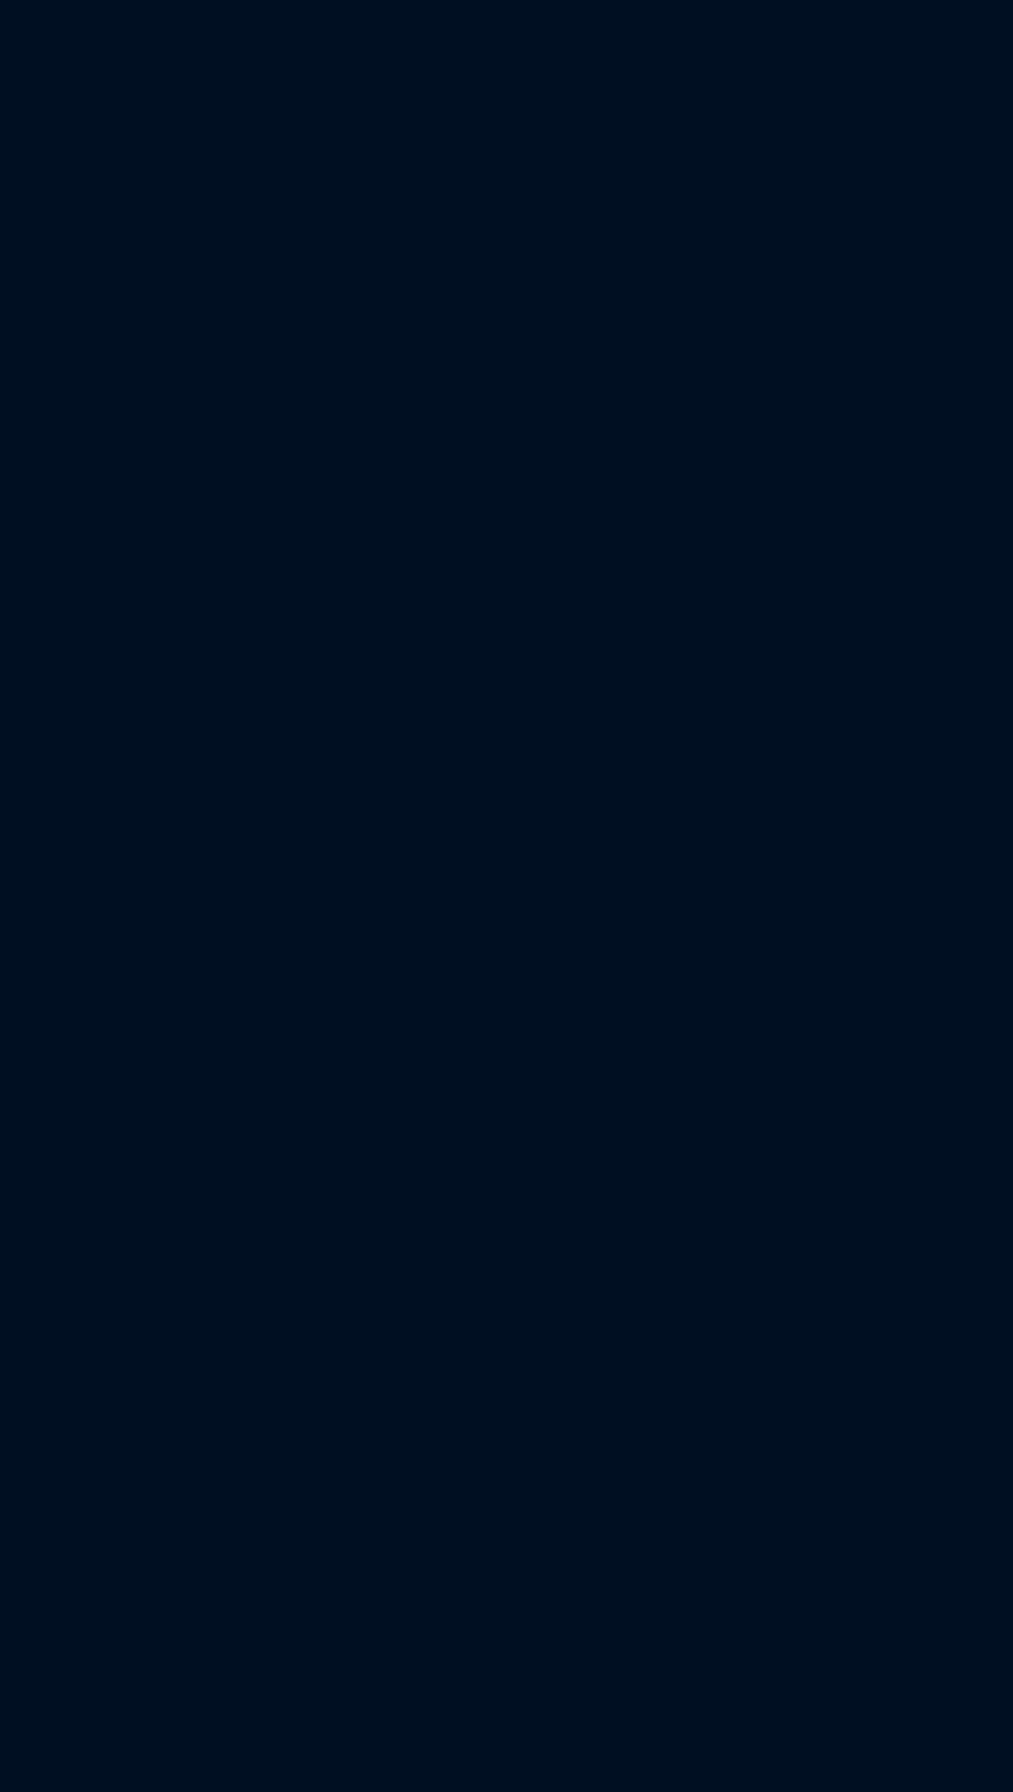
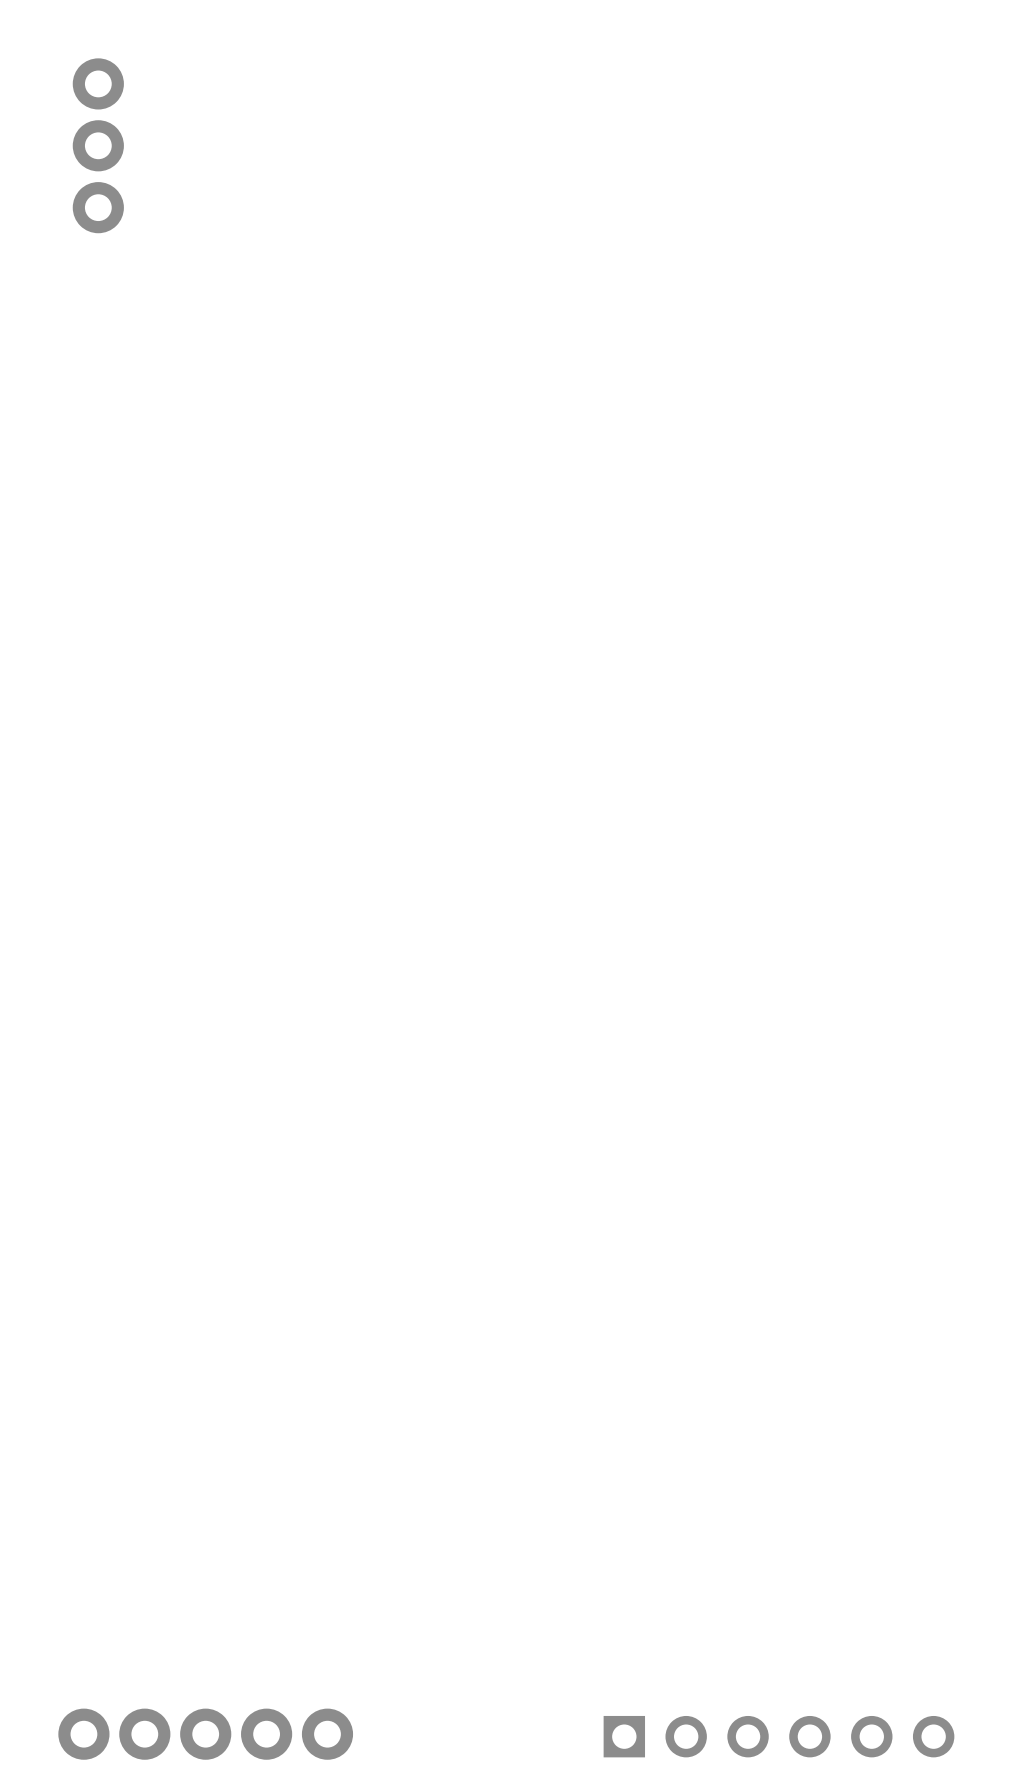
part: none -> (98, 145)
part: none -> (205, 1734)
part: none -> (778, 1736)

